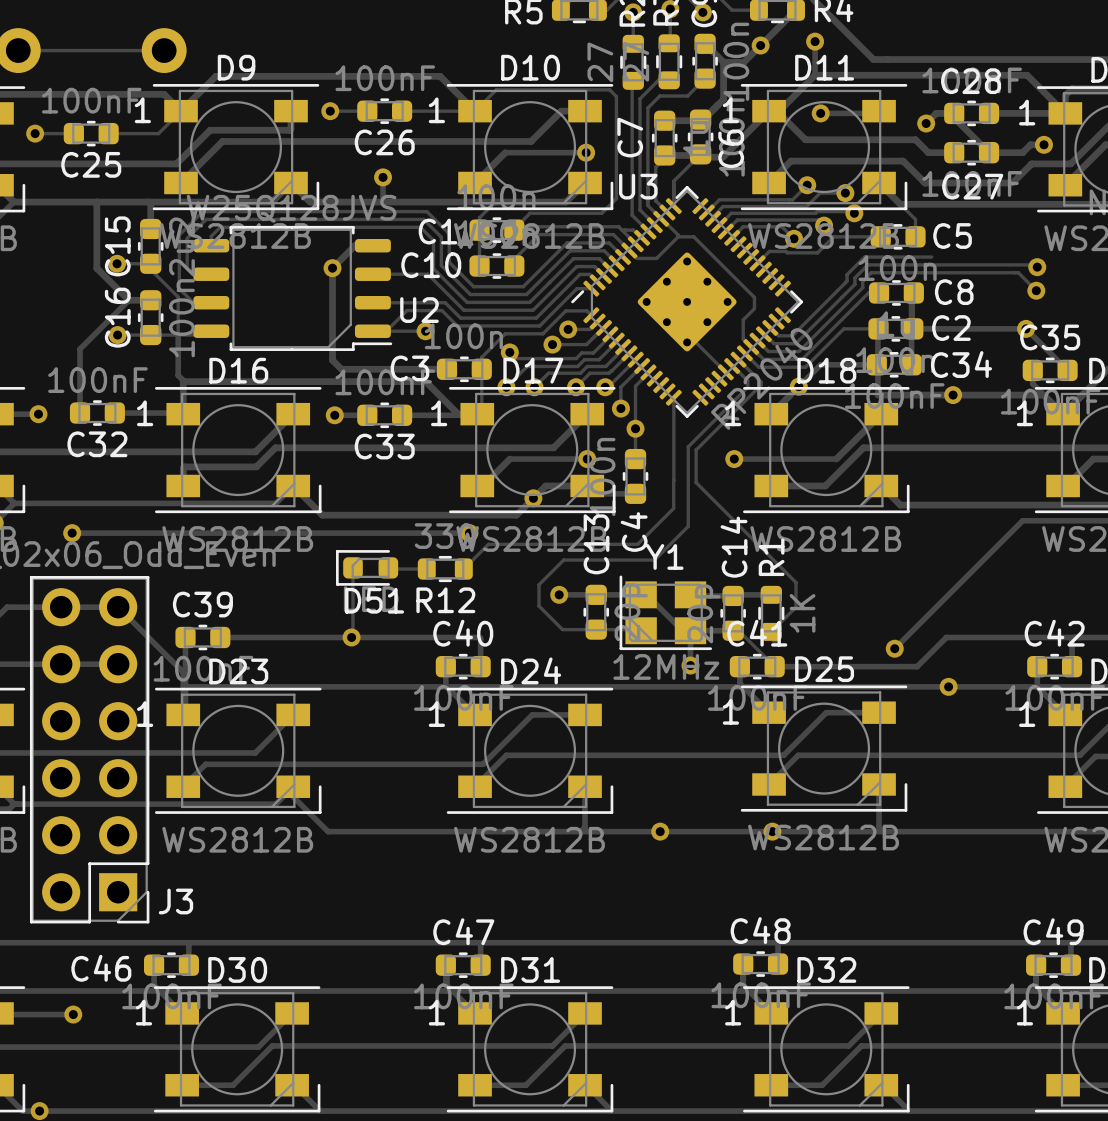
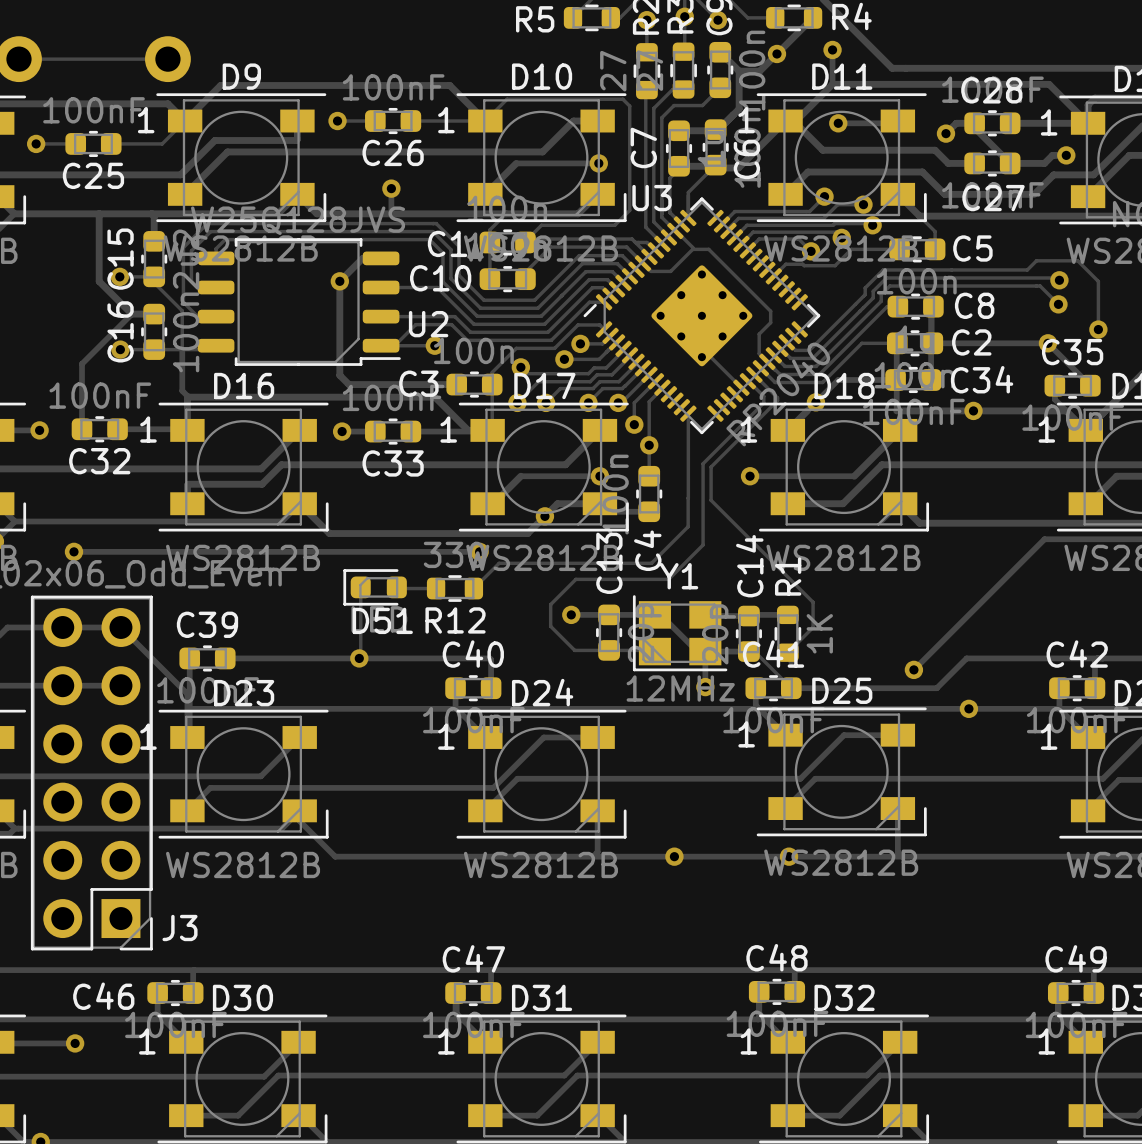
track: none -> (951, 269) (1027, 269) (1036, 260) (1077, 260) (1098, 281) (1098, 329)
via: none -> (1098, 329)

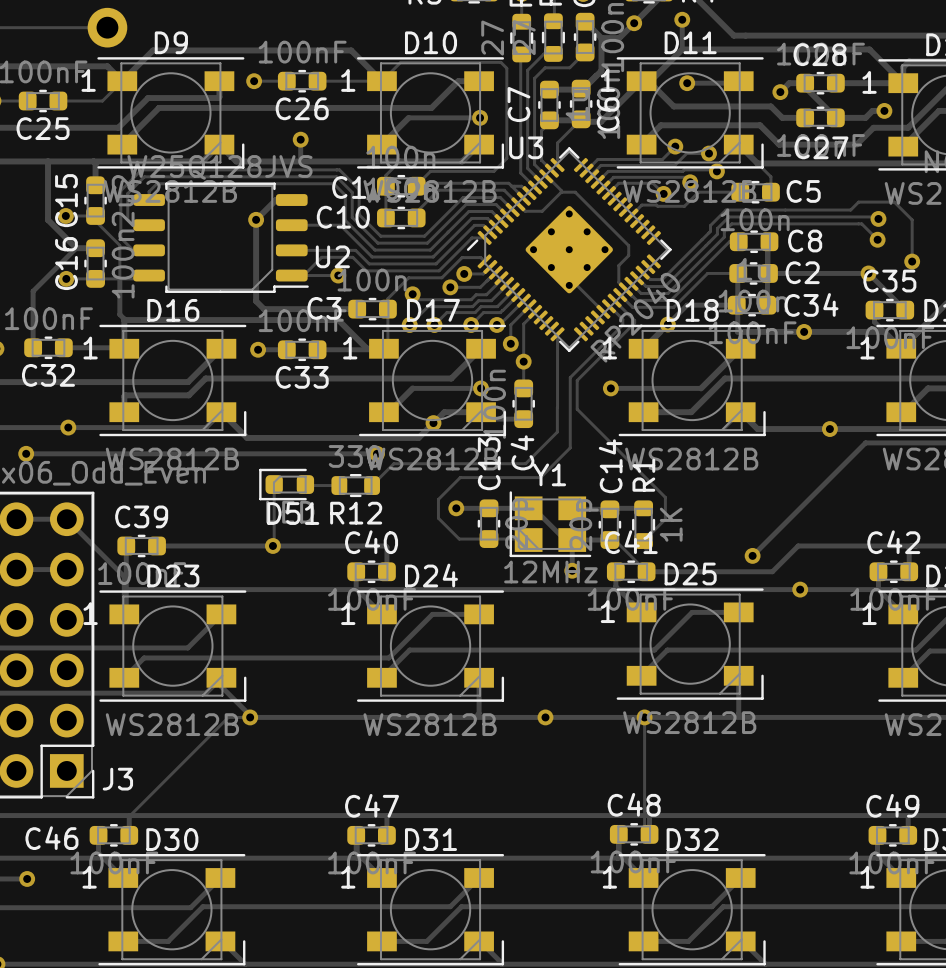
via: none -> (68, 427)
via: none -> (829, 429)
via: none -> (250, 717)
track: none -> (252, 717) (228, 717) (129, 816)
track: none -> (644, 717) (644, 829) (649, 834)

